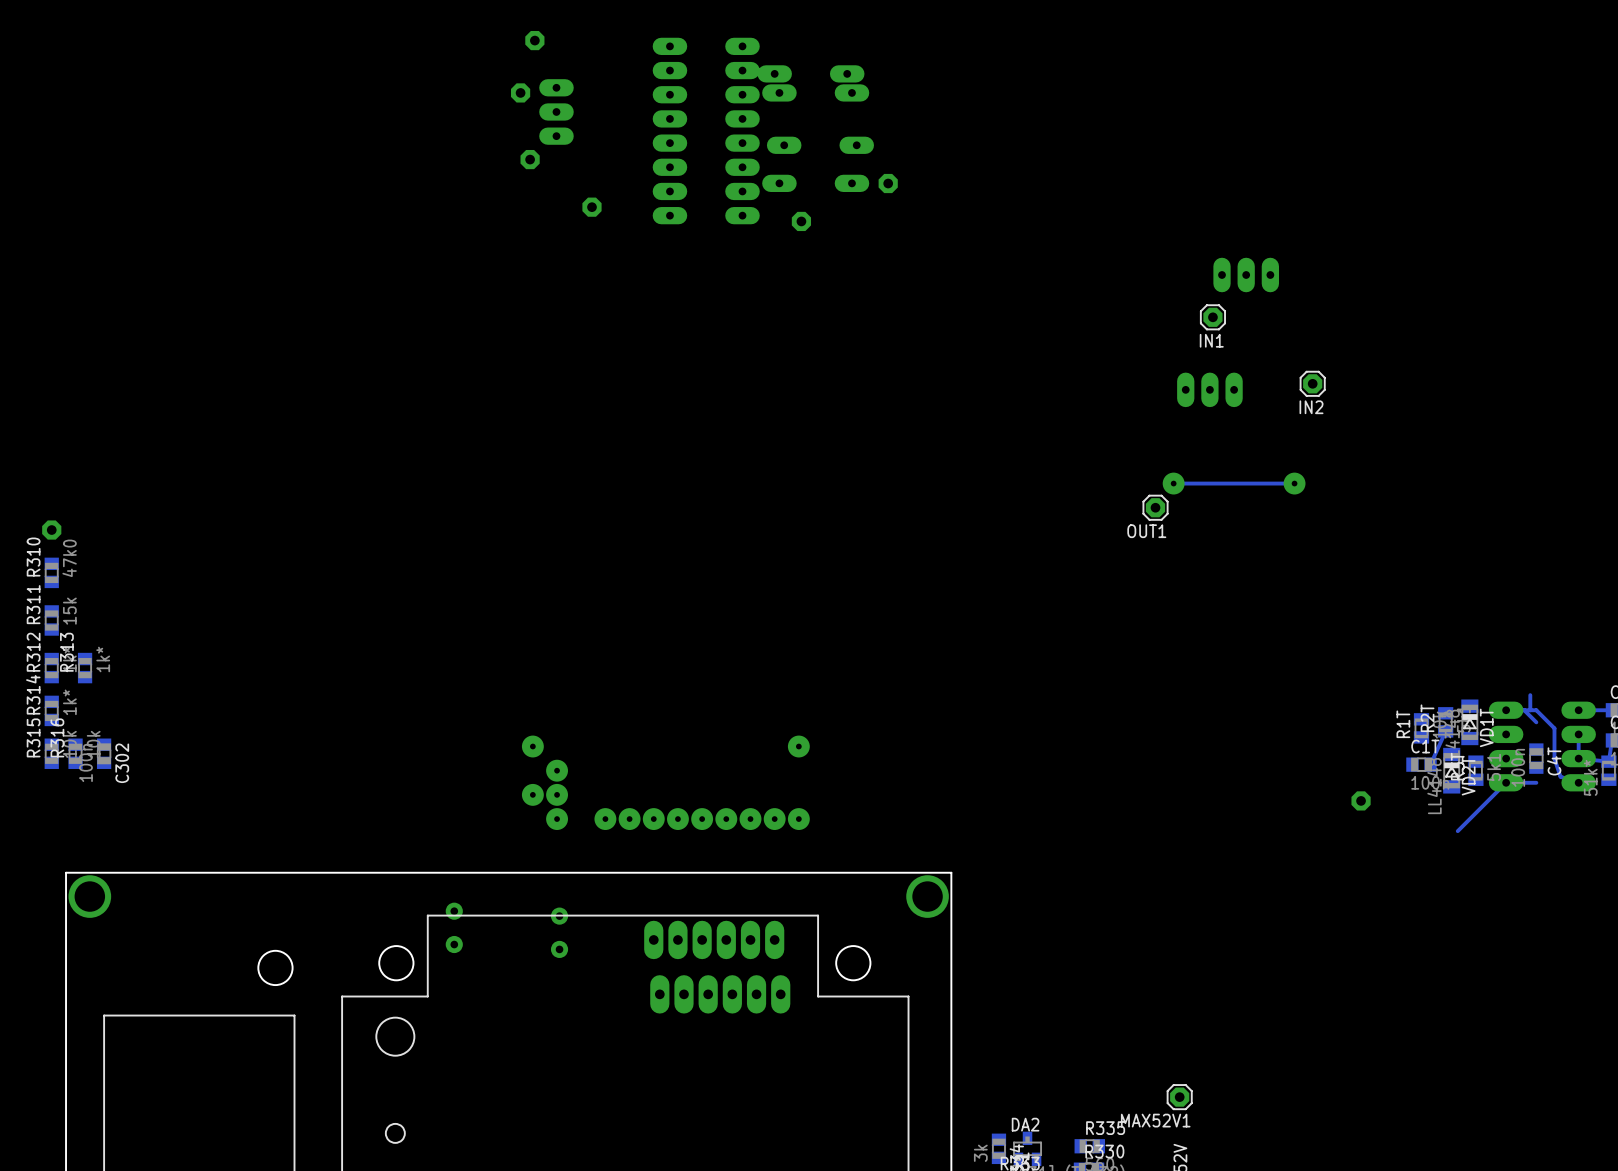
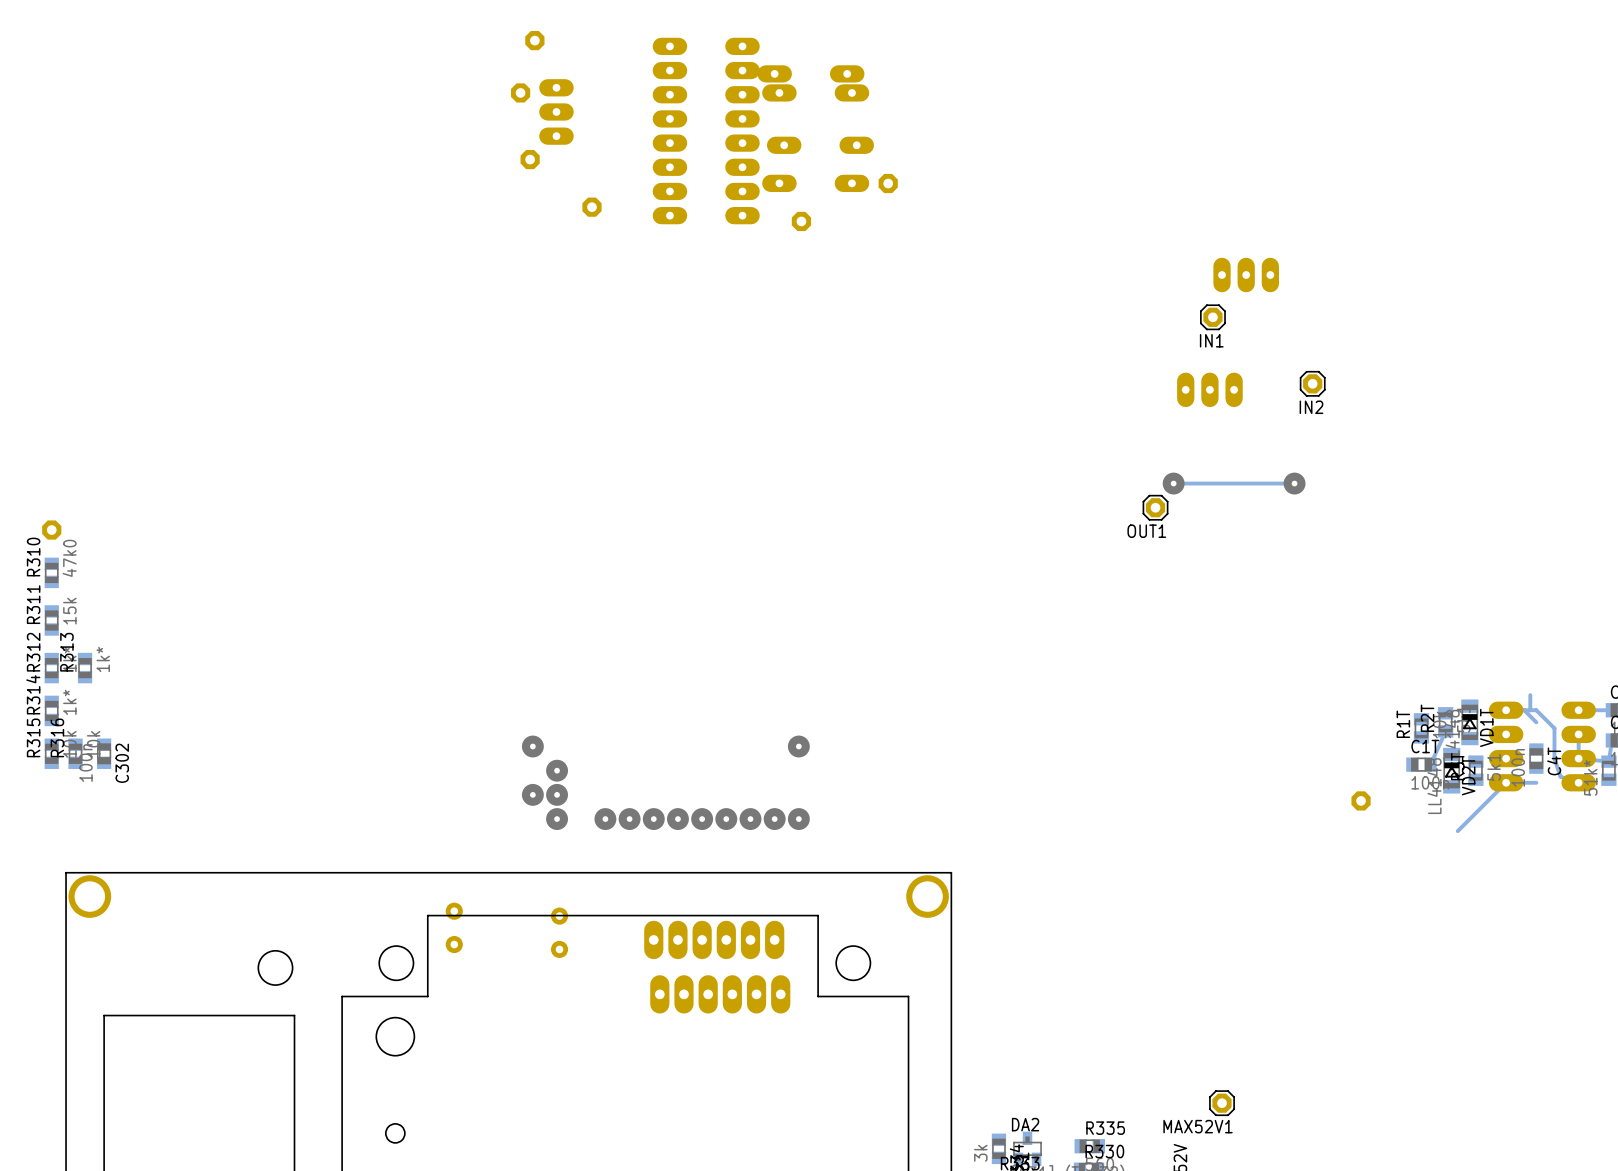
MAX52V1 position: (1179, 1097) -> (1222, 1103)

